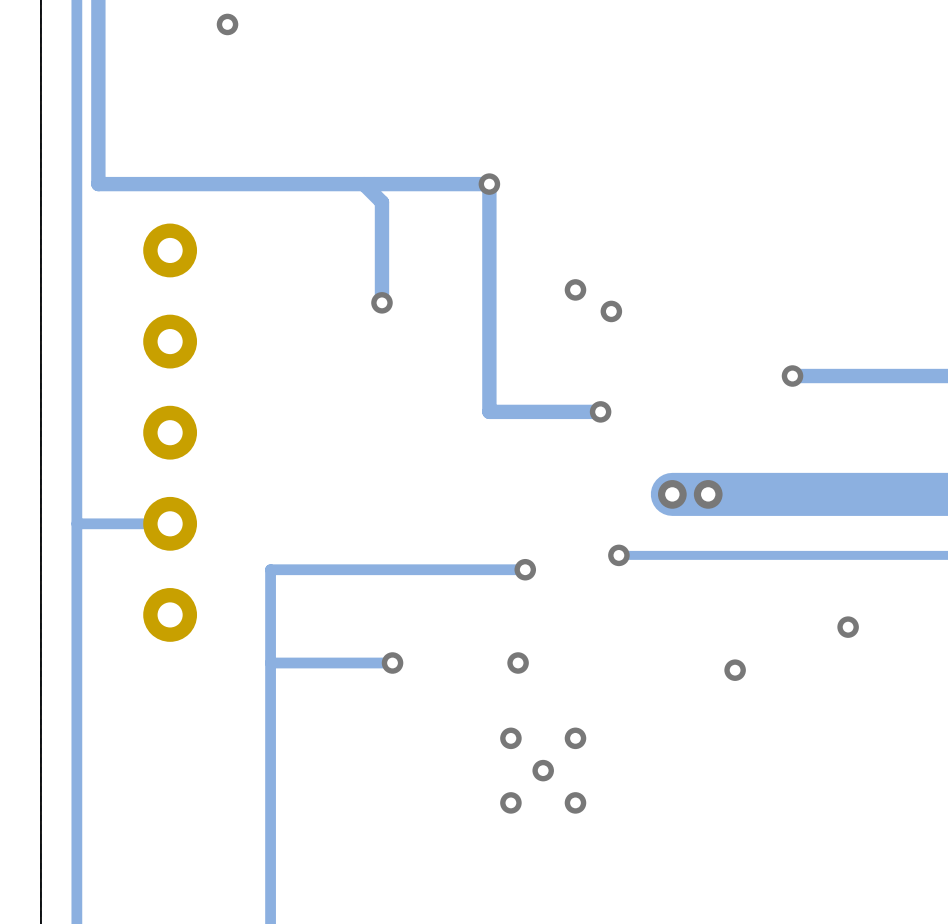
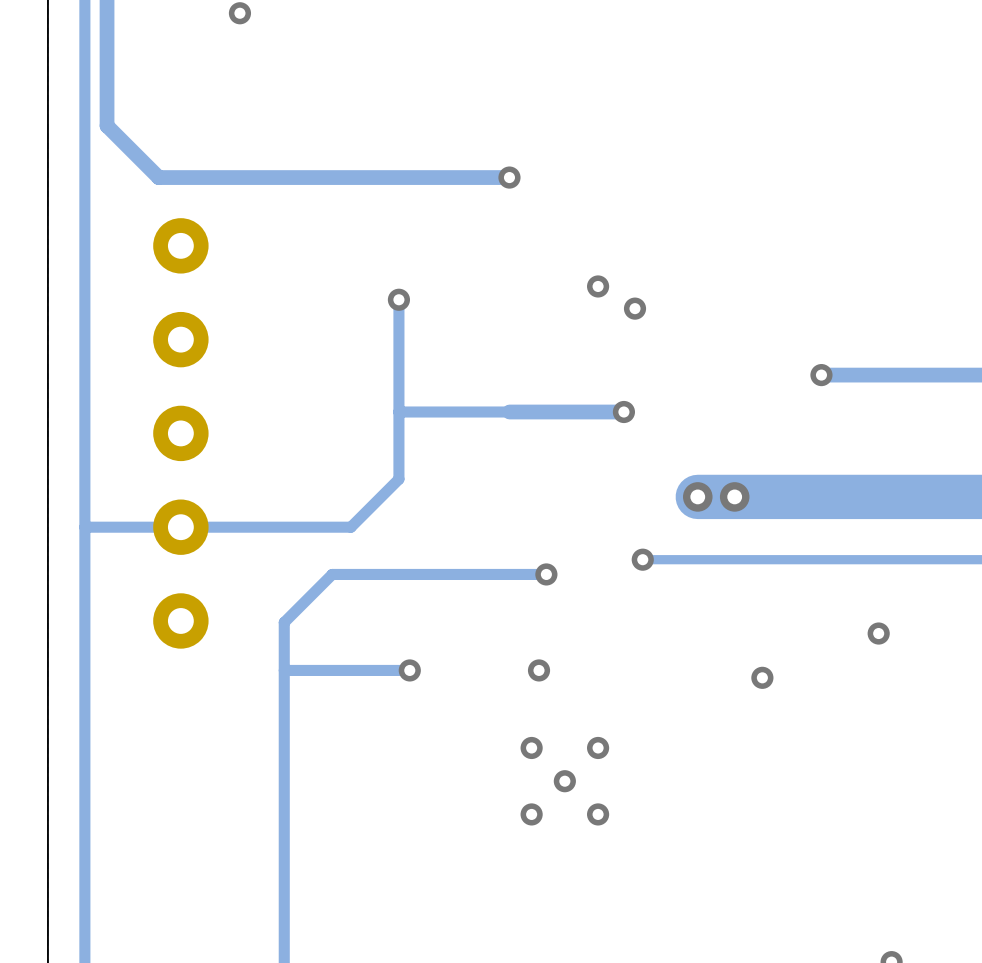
track: (98, 133) (98, 184) (148, 184) -> (107, 125) (158, 177)
track: (363, 184) (381, 202) (381, 302) -> (180, 527) (350, 527) (398, 479) (398, 299)
track: (489, 184) (489, 411) -> (398, 412) (509, 412)
track: (317, 569) (270, 569) (270, 616) -> (332, 574) (284, 622)

